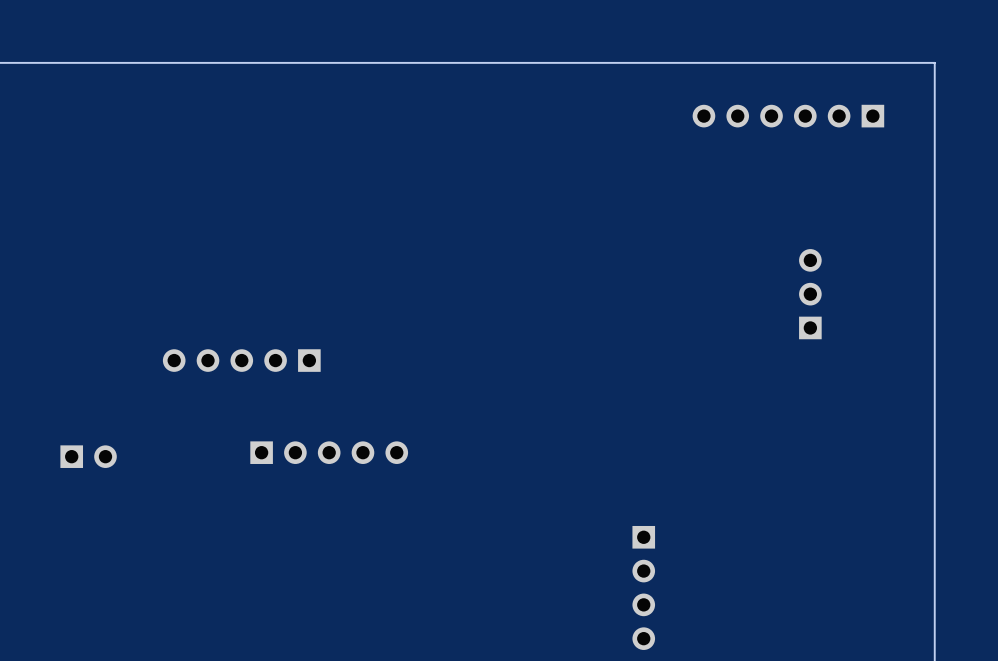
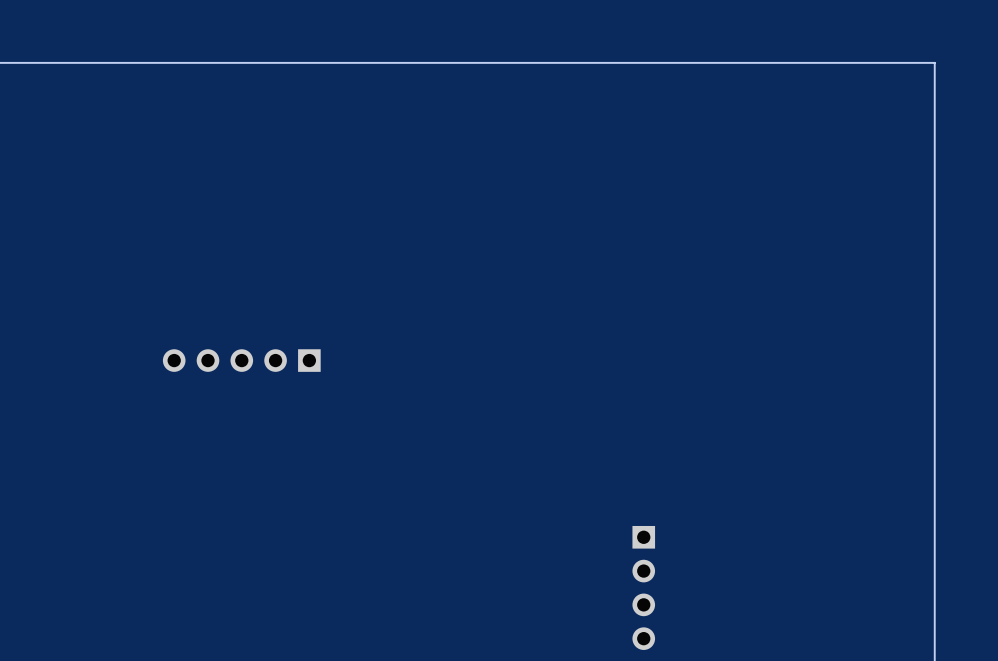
part: (788, 116) -> none
part: (810, 294) -> none
part: (329, 452) -> none
part: (88, 456) -> none

